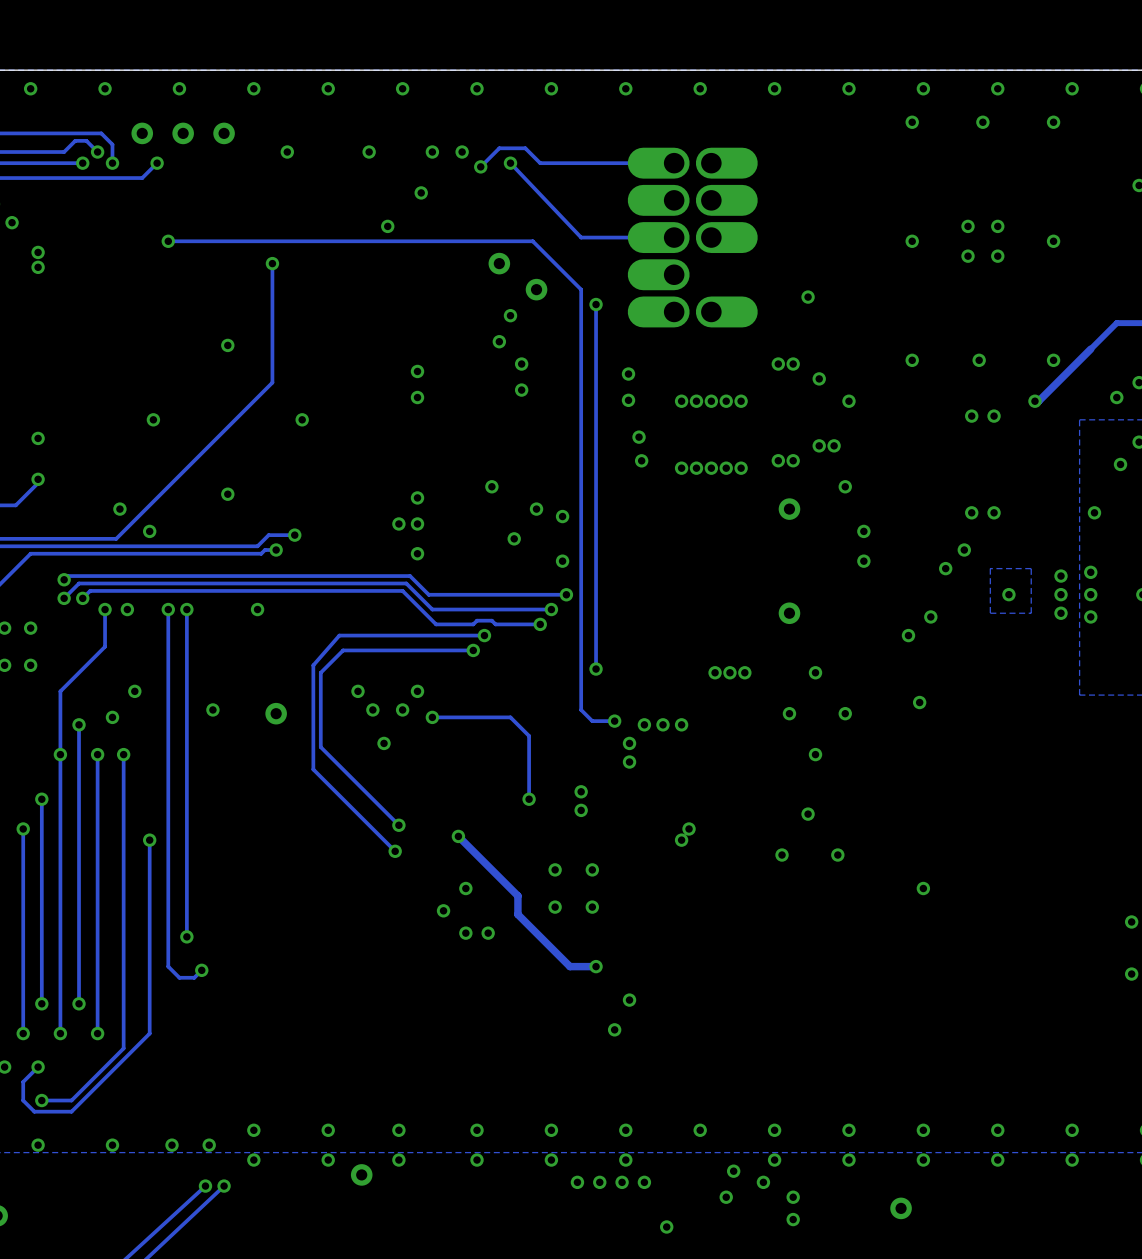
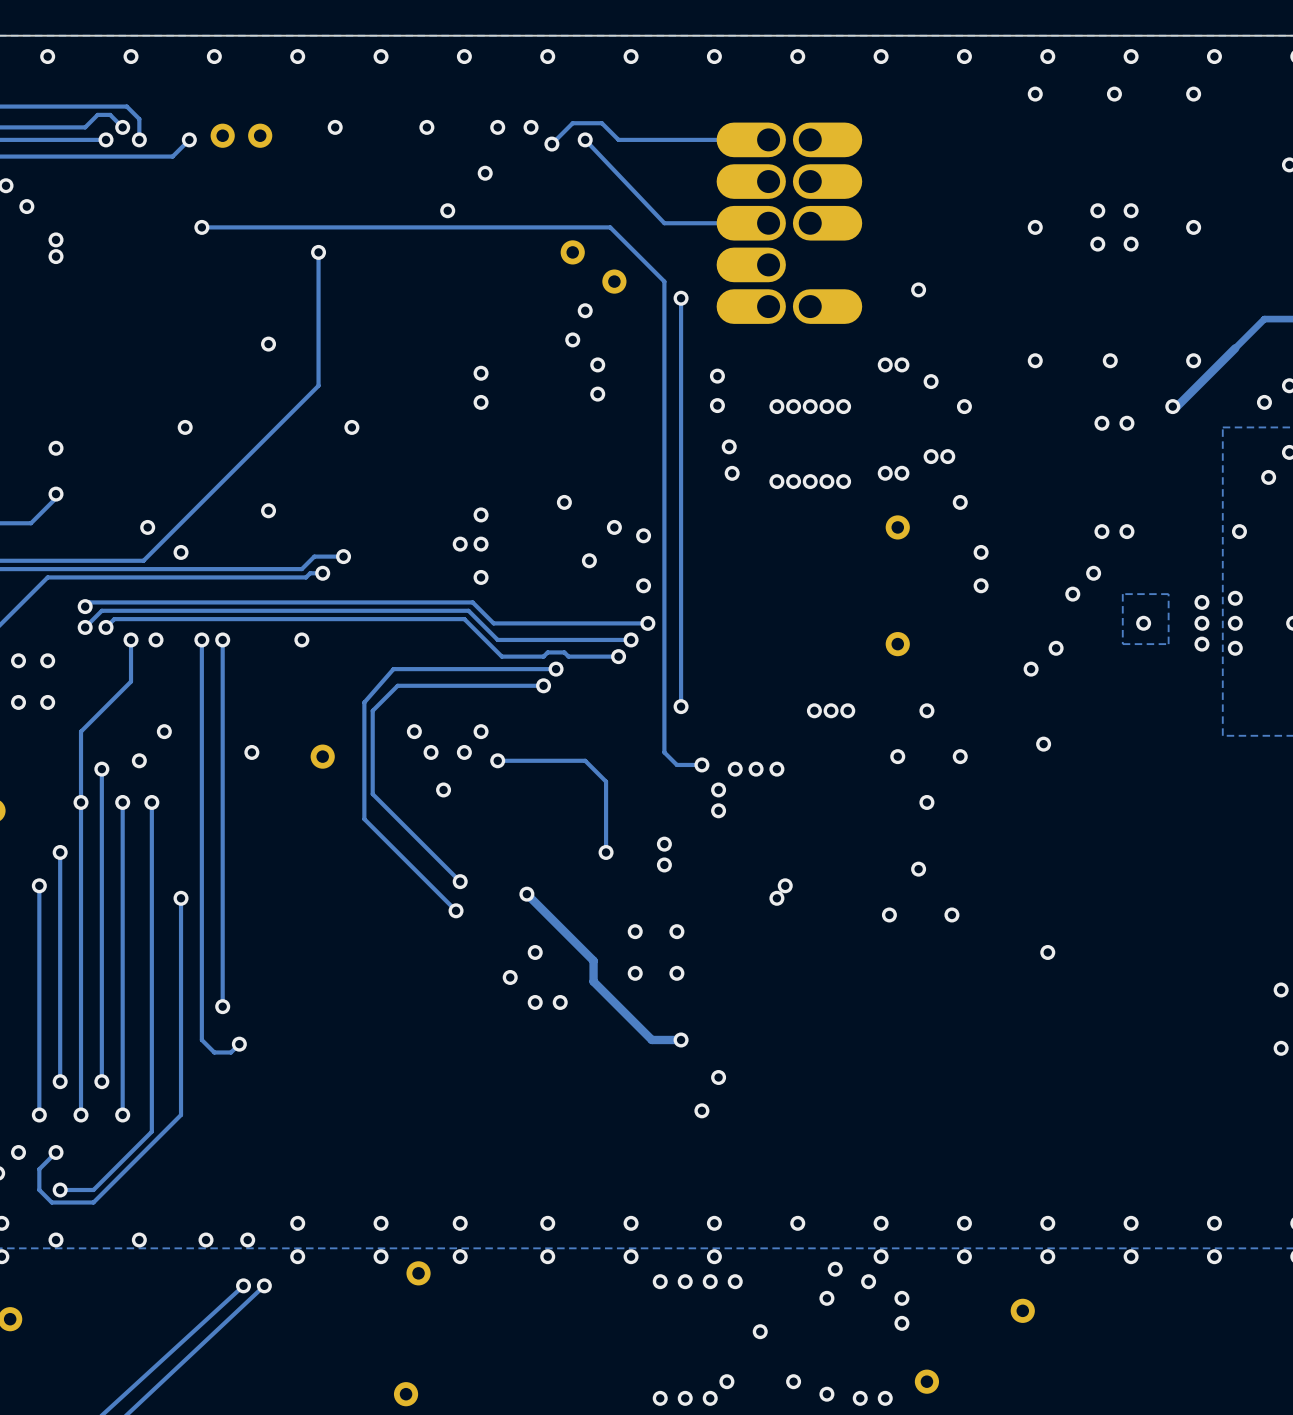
part: (142, 133) -> none
part: (183, 133) -> none
part: (224, 133) -> none
part: none -> (222, 135)
part: none -> (260, 135)

